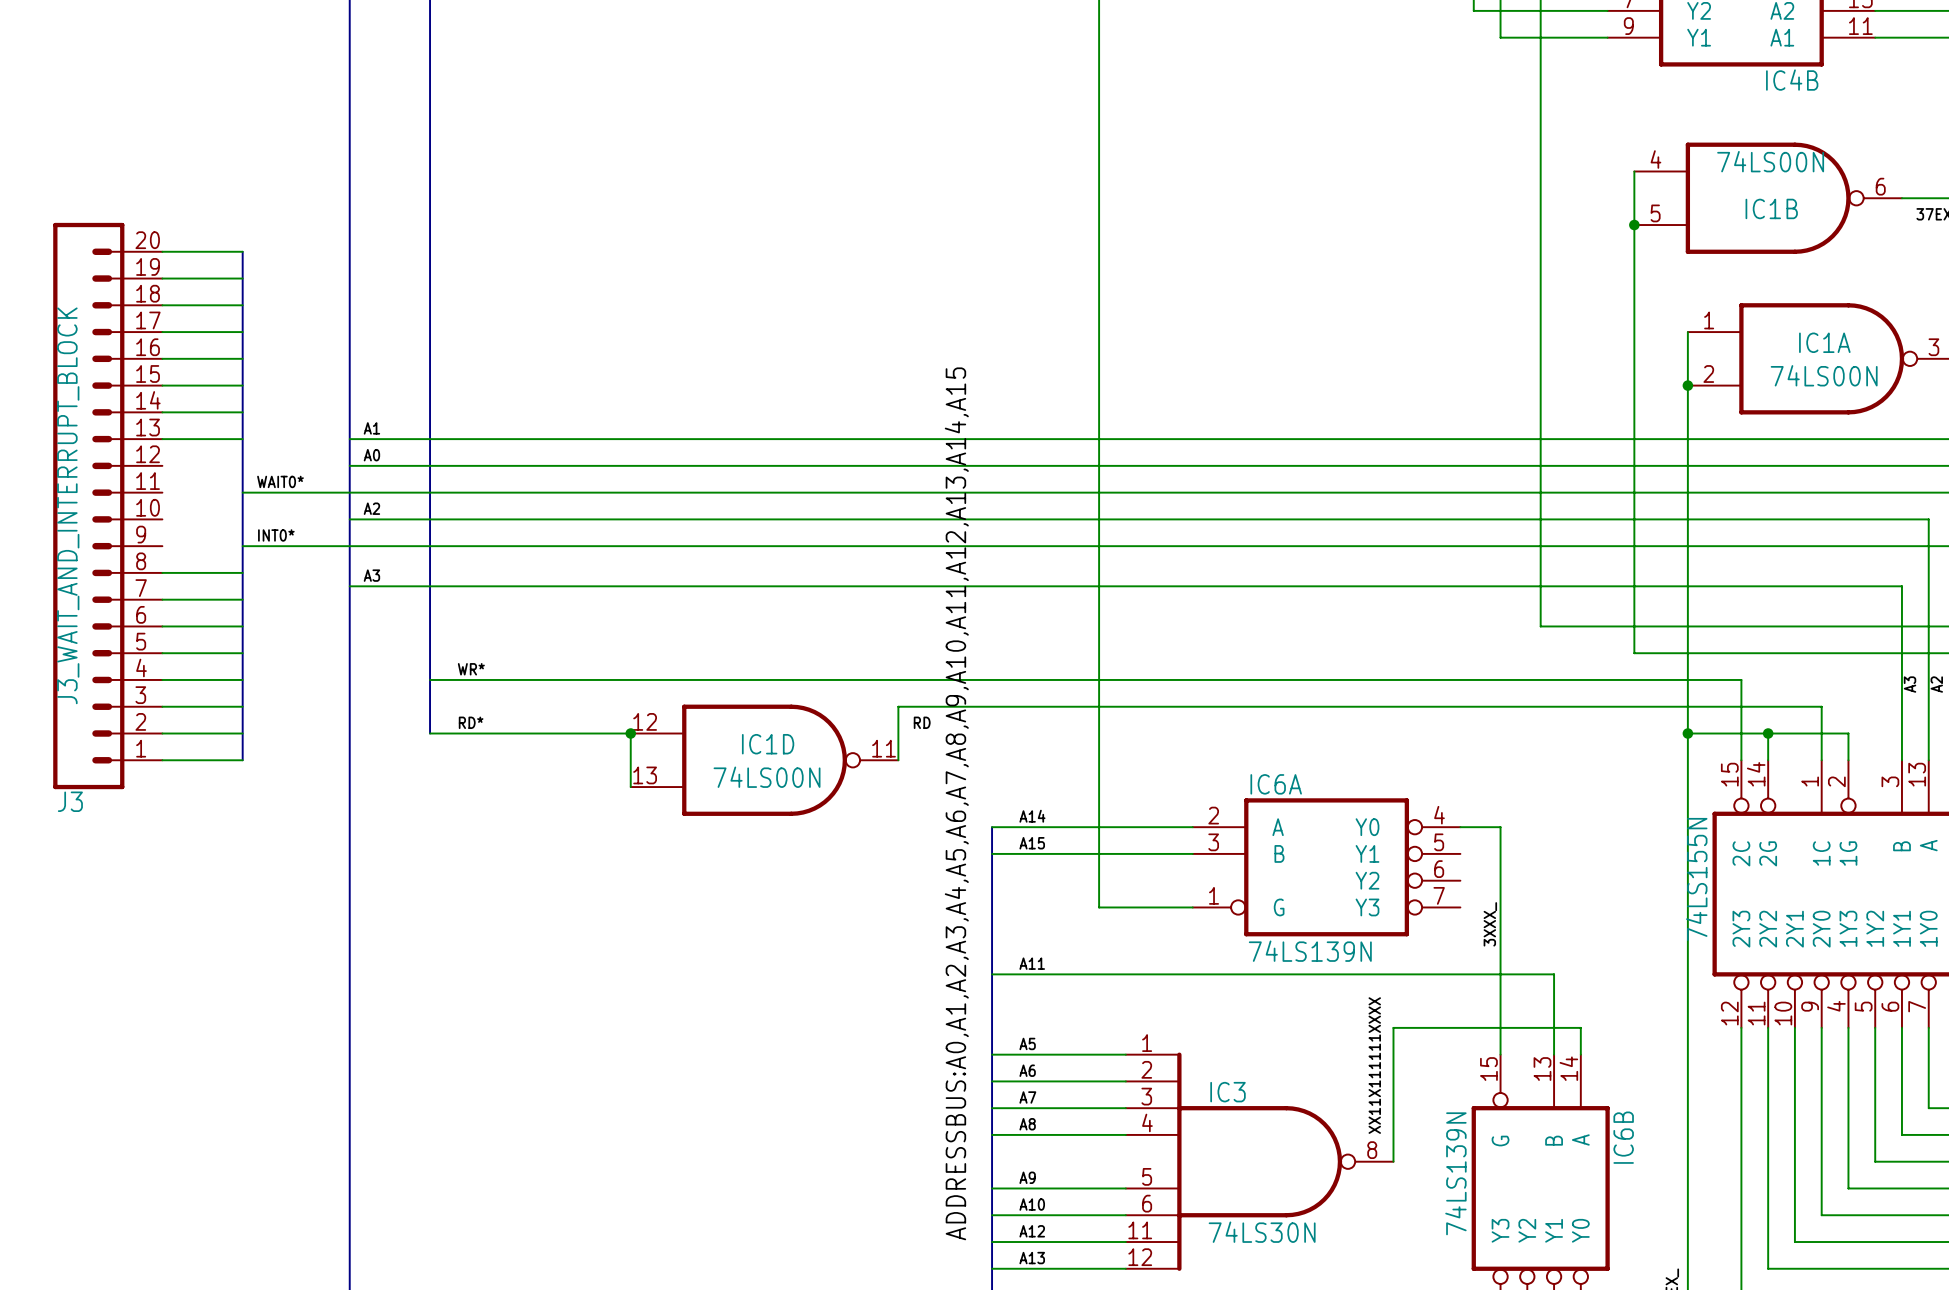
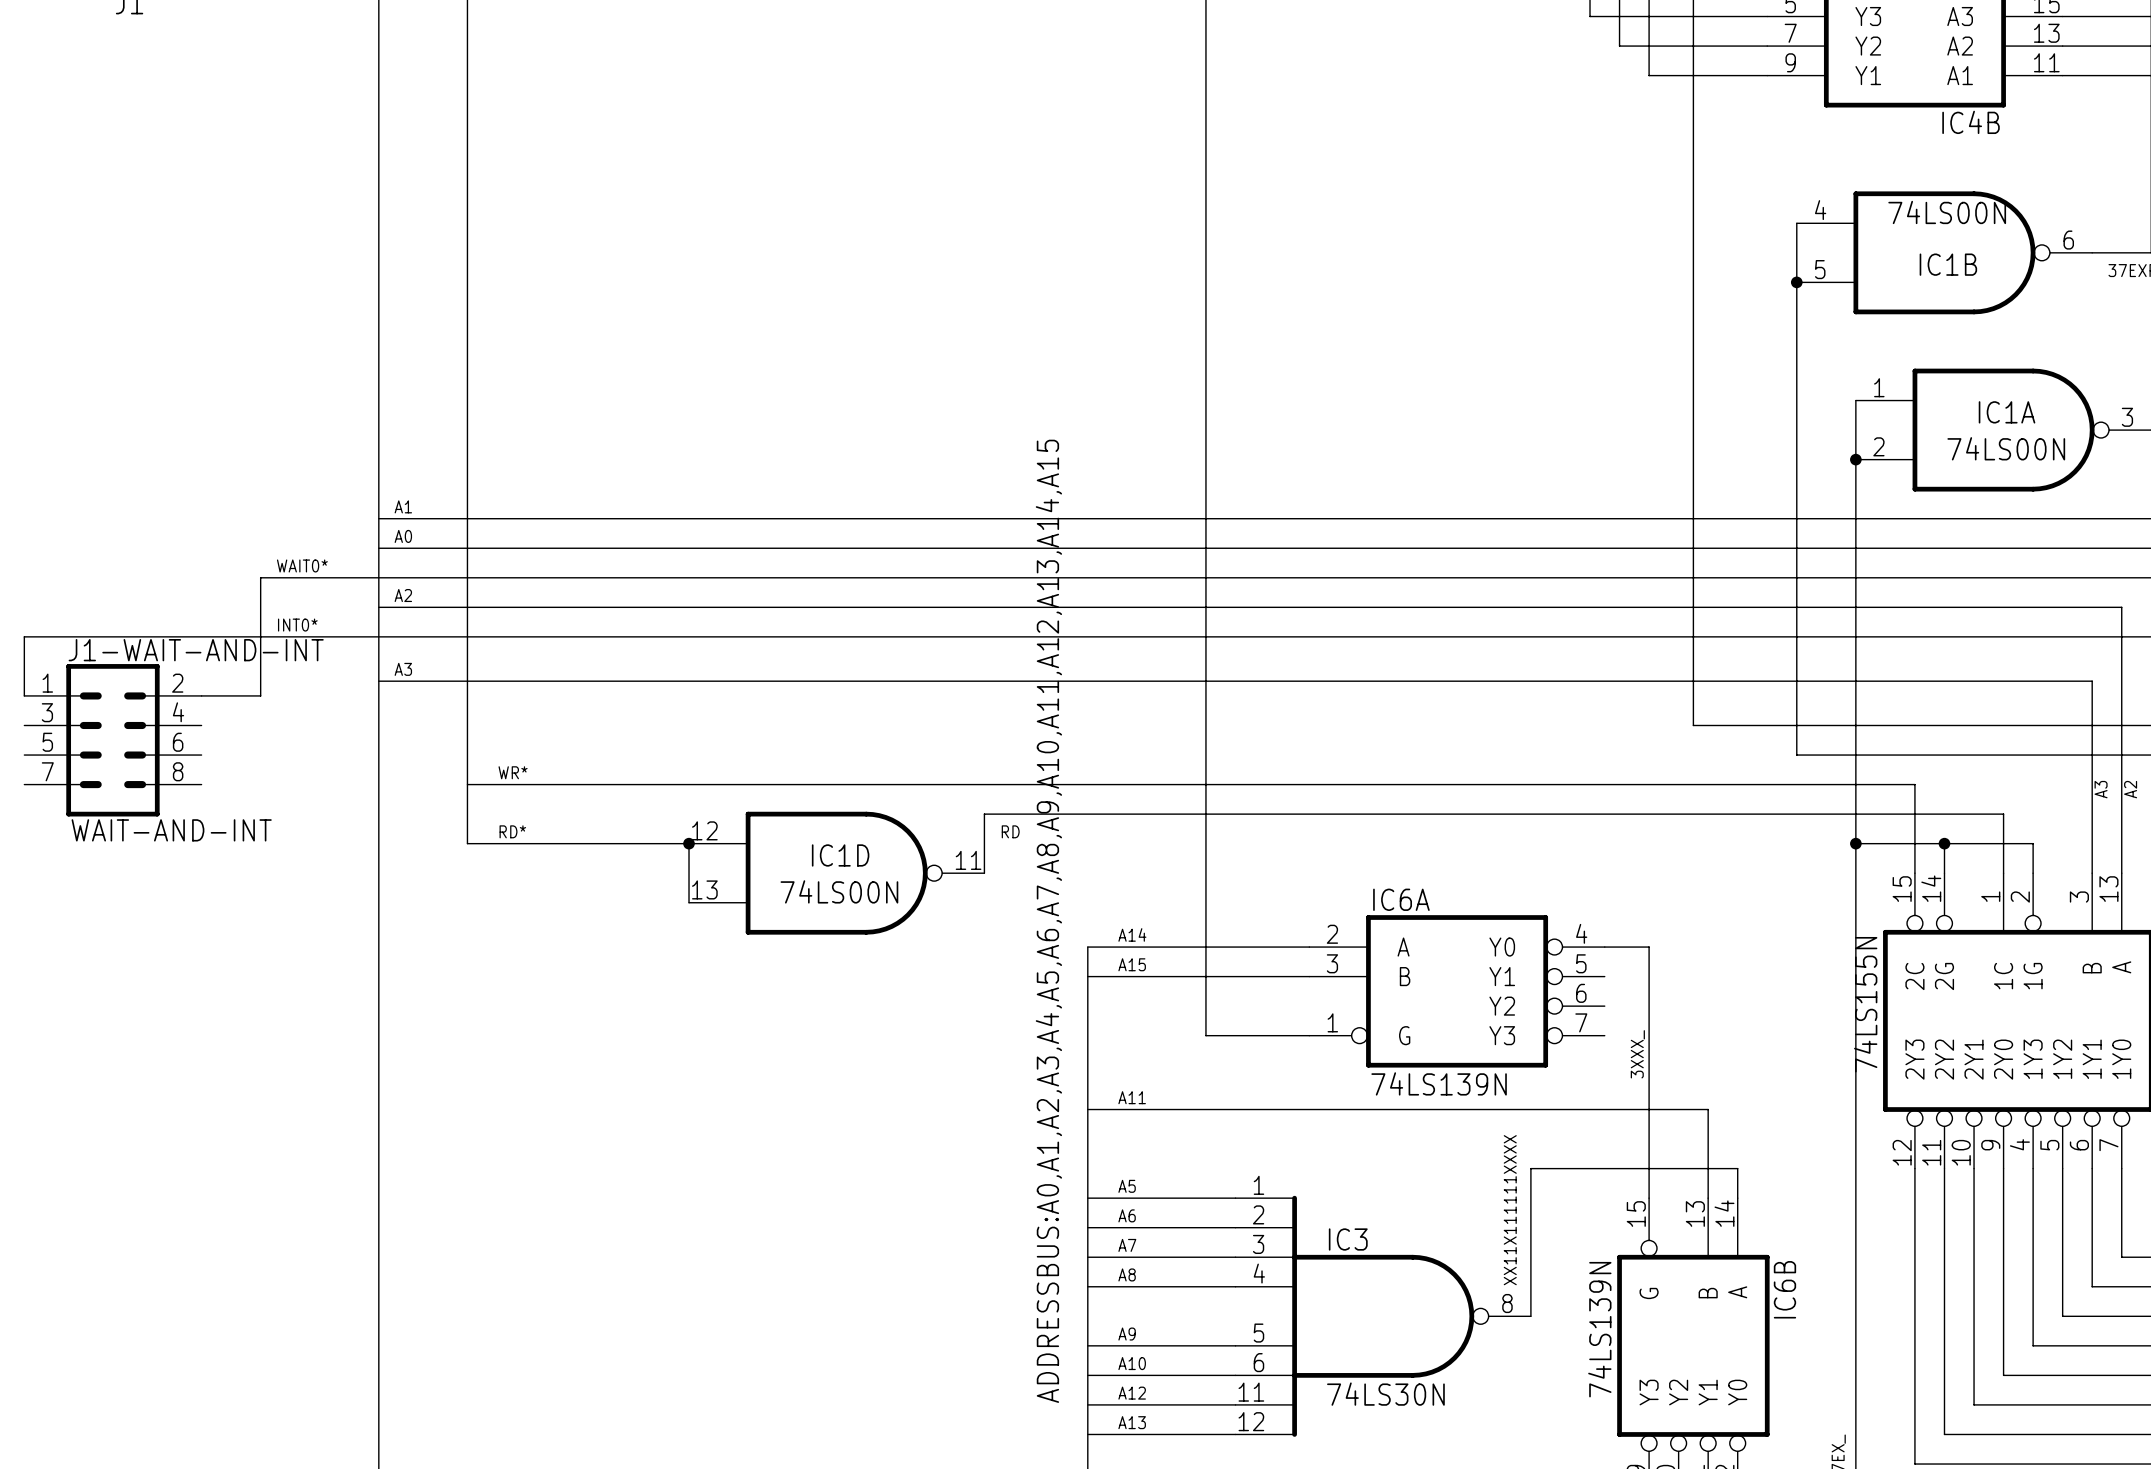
wire: (162, 251) (242, 251) -> none
bus: (242, 251) (242, 760) -> none
wire: (162, 278) (242, 278) -> none
wire: (162, 305) (242, 305) -> none
wire: (162, 332) (242, 332) -> none
wire: (162, 358) (242, 358) -> none
wire: (162, 385) (242, 385) -> none
wire: (162, 412) (242, 412) -> none
wire: (162, 439) (242, 439) -> none
J3_WAIT_AND_INTERRUPT_BLOCK: J3 (107, 506) -> none
wire: none -> (260, 636) (24, 636) (24, 695)
wire: (162, 572) (242, 572) -> none
wire: (162, 626) (242, 626) -> none
J1-WAIT-AND-INT: none -> WAIT-AND-INT (112, 740)
wire: (162, 653) (242, 653) -> none
wire: (162, 679) (242, 679) -> none
wire: (162, 706) (242, 706) -> none
wire: (162, 733) (242, 733) -> none
wire: (162, 760) (242, 760) -> none

